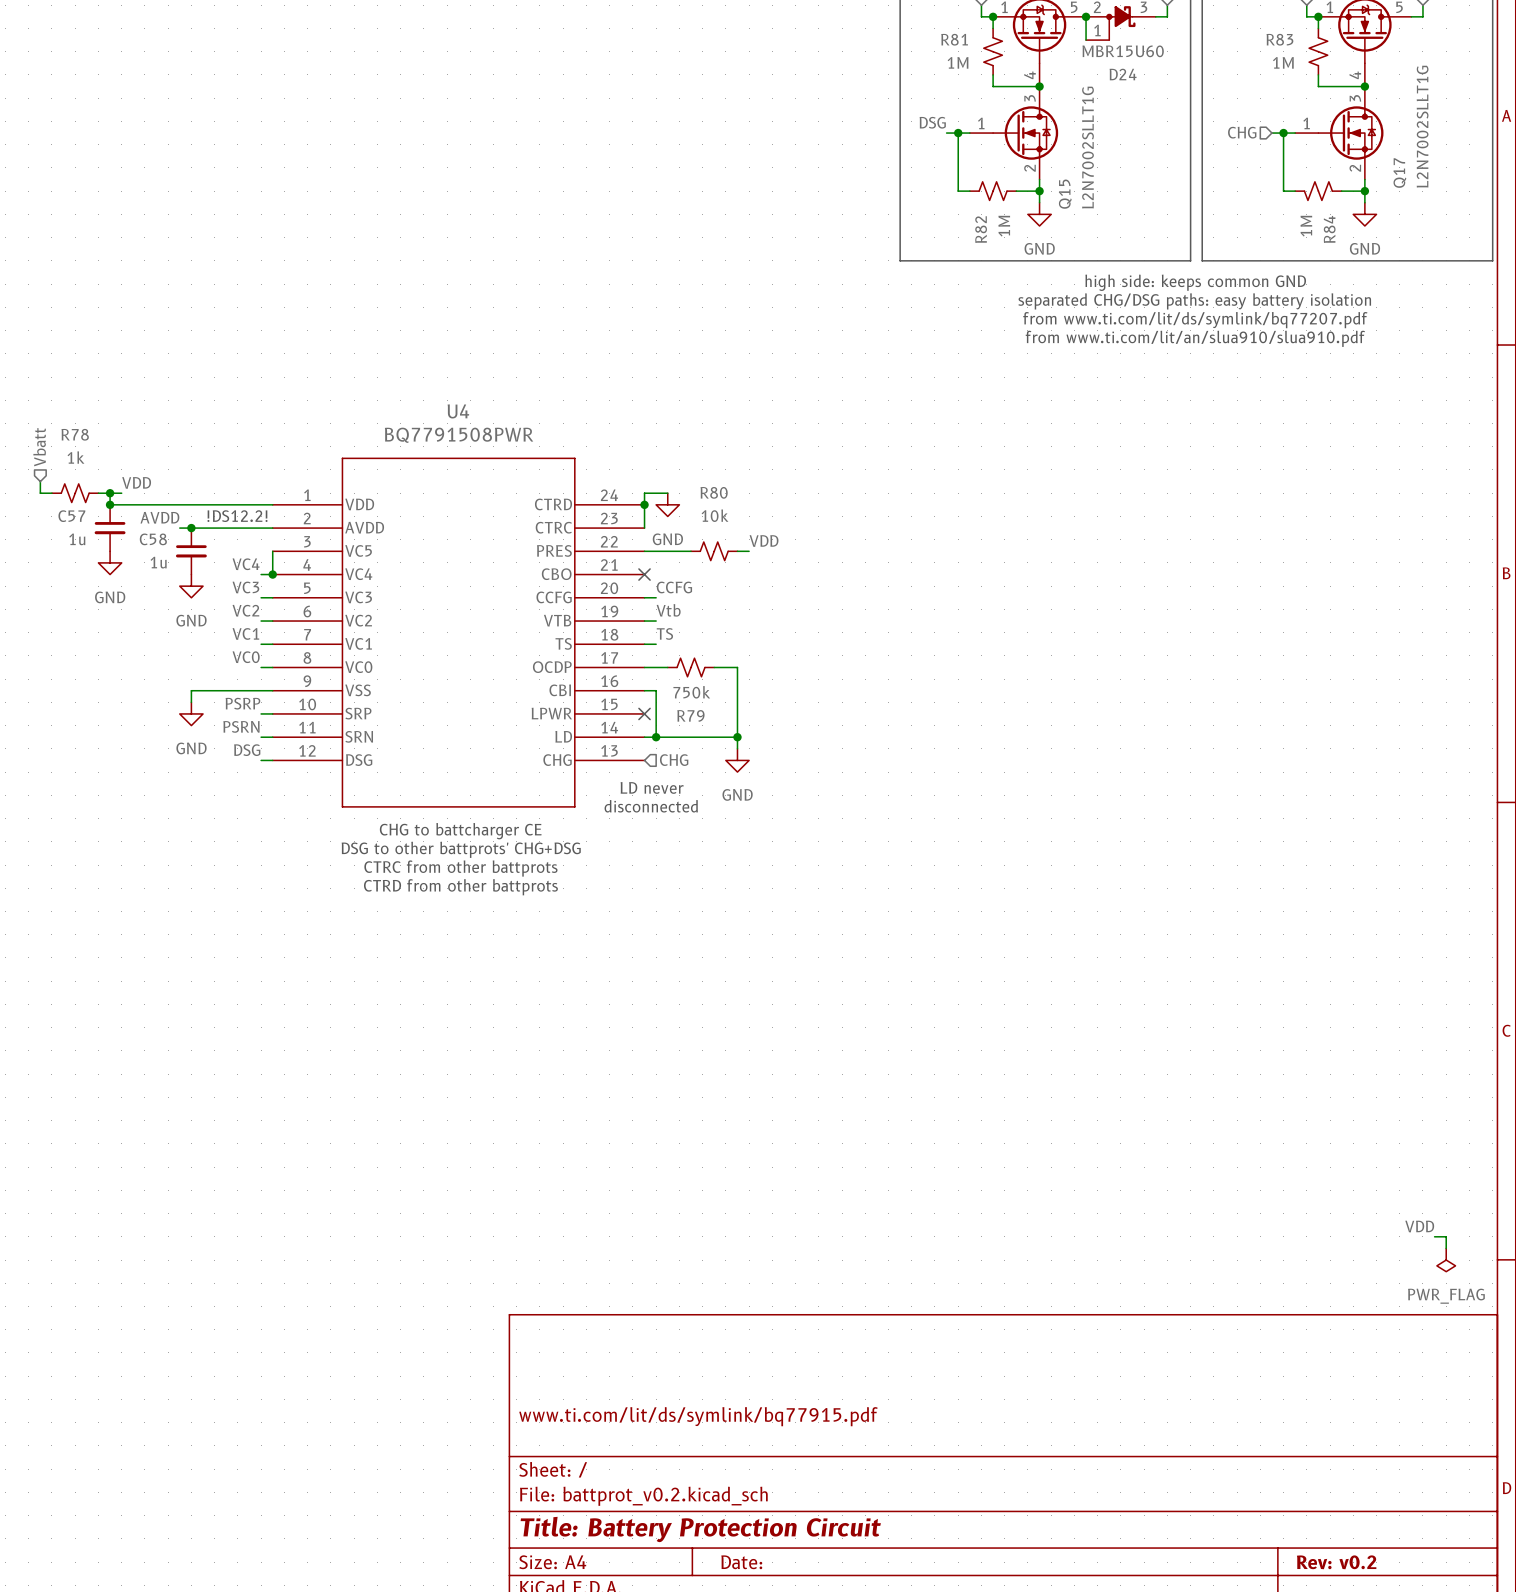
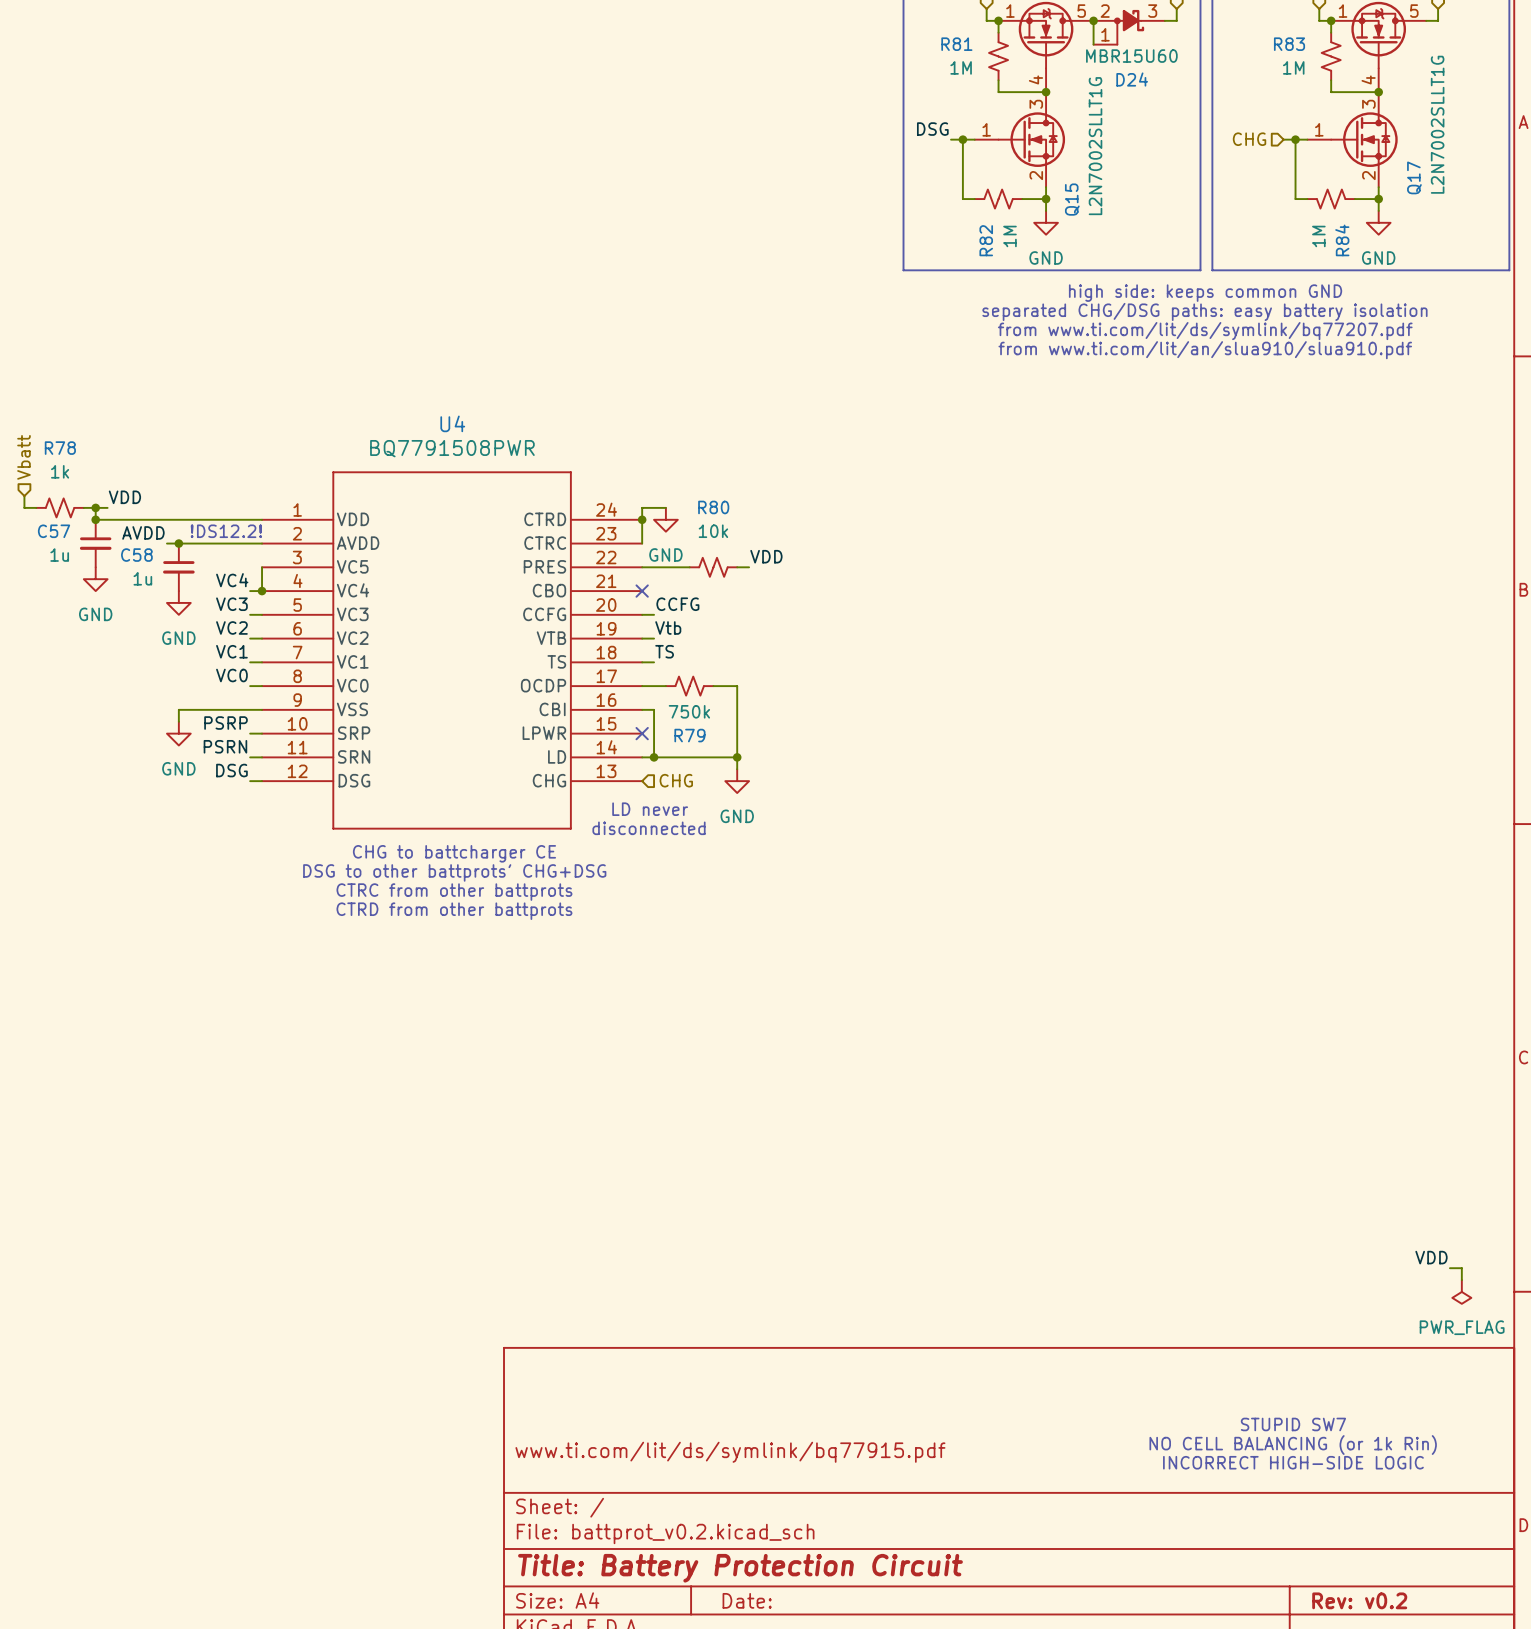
text: none -> STUPID SW7 (1293, 1424)
text: none -> NO CELL BALANCING (or 1k Rin) (1293, 1445)
text: none -> INCORRECT HIGH-SIDE LOGIC (1293, 1462)

